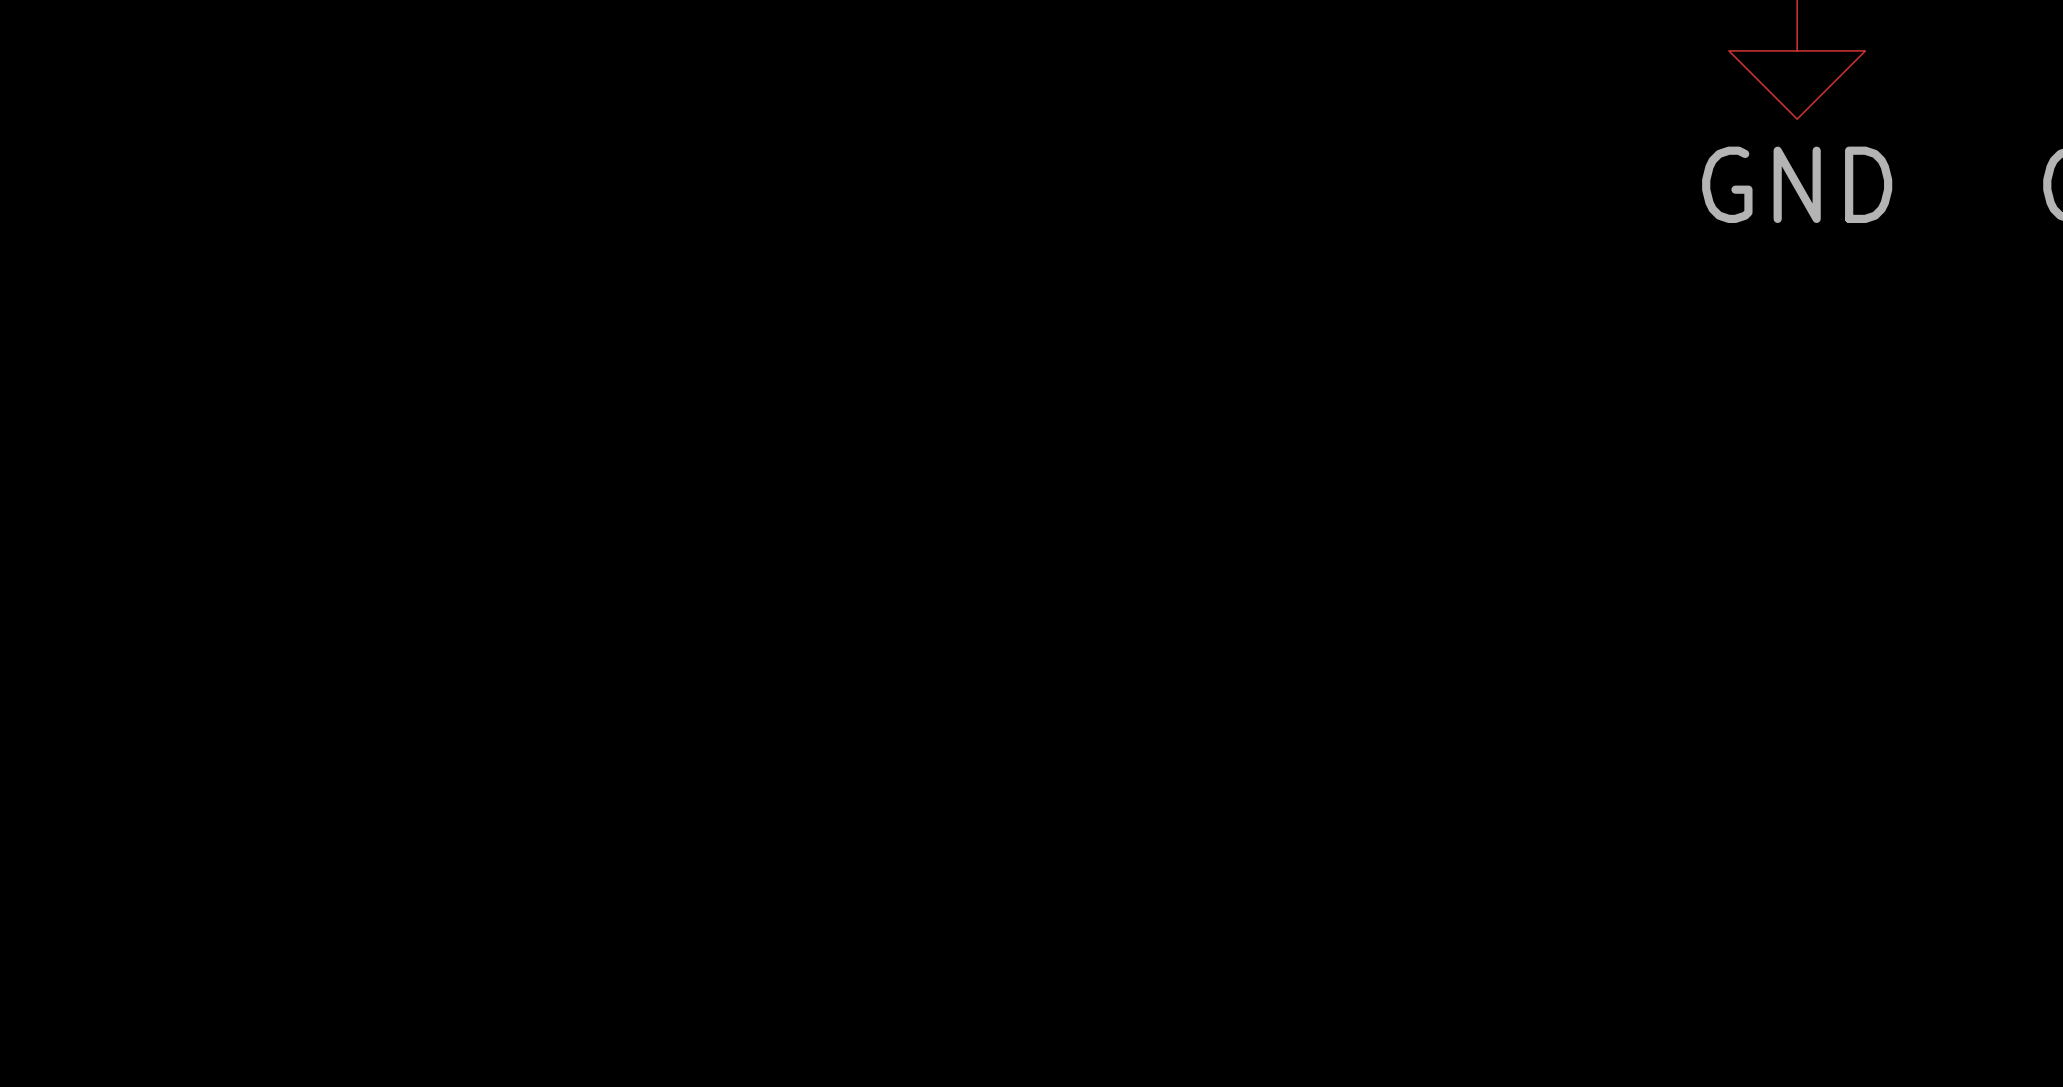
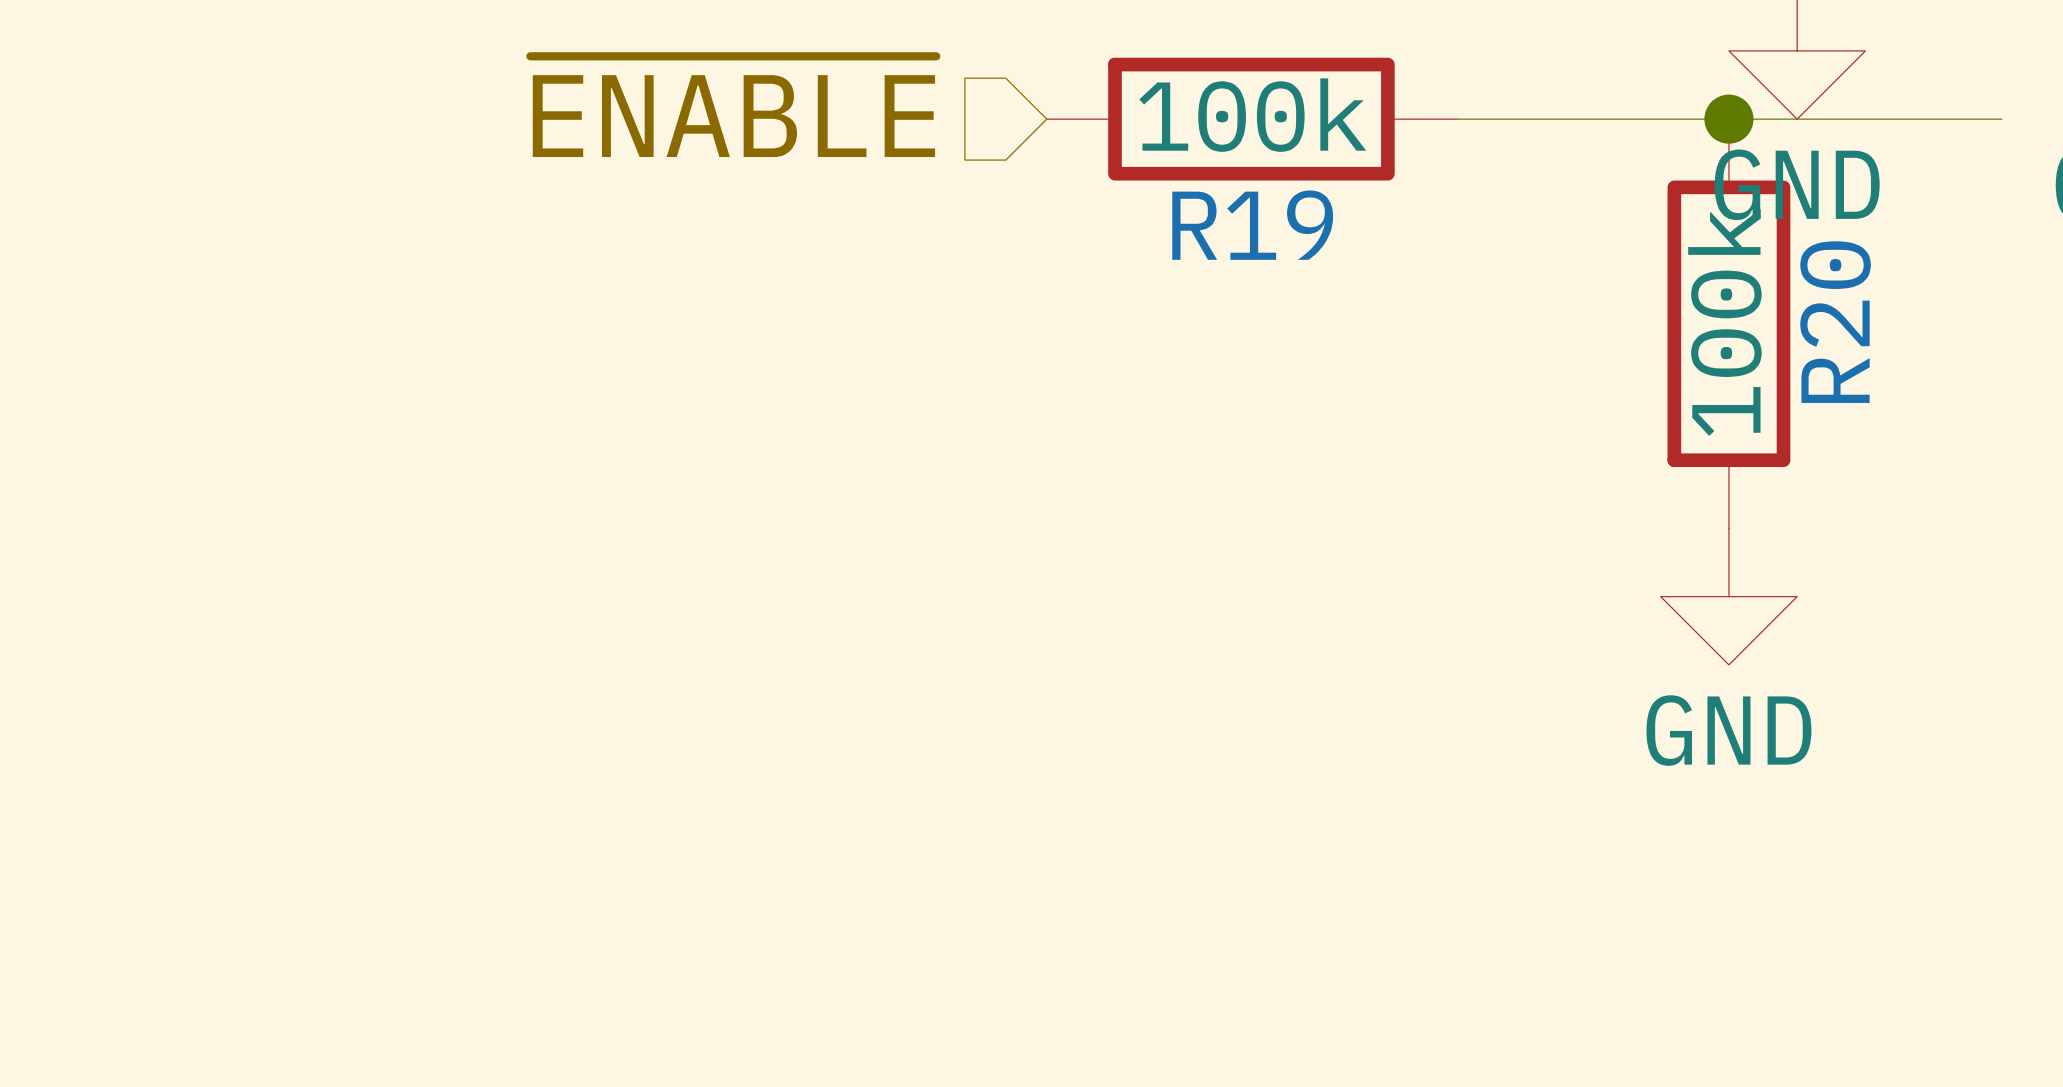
hierarchical label: none -> ~{ENABLE} (733, 106)
R19: none -> 100k (1251, 119)
wire: none -> (1456, 119) (2001, 119)
junction: none -> (1728, 119)
R20: none -> 100k (1728, 323)
power symbol: none -> GND (1728, 596)

